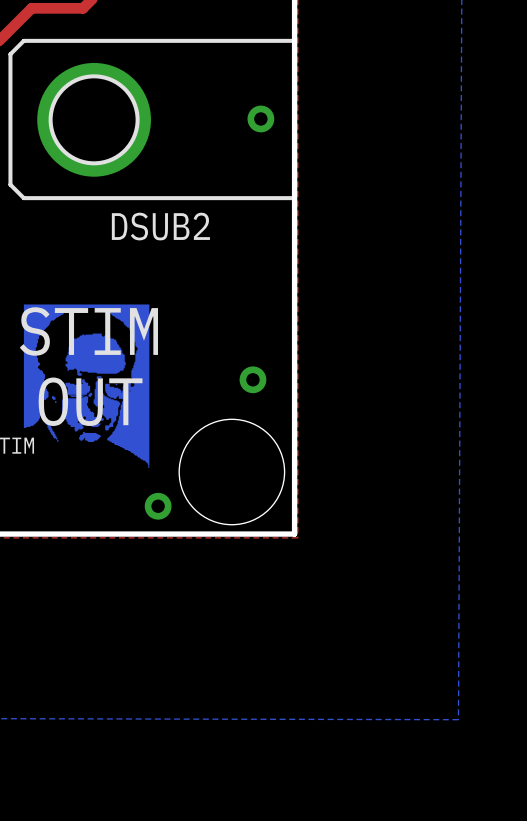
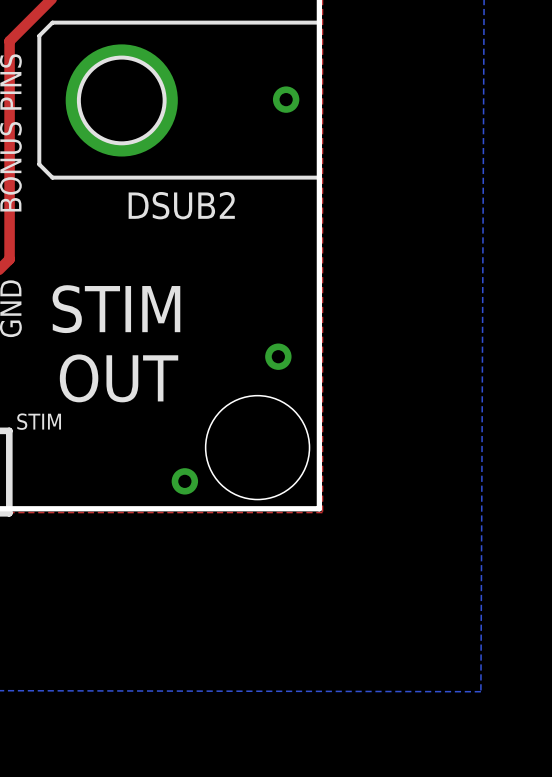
drawing: [23, 304, 150, 468] -> none

